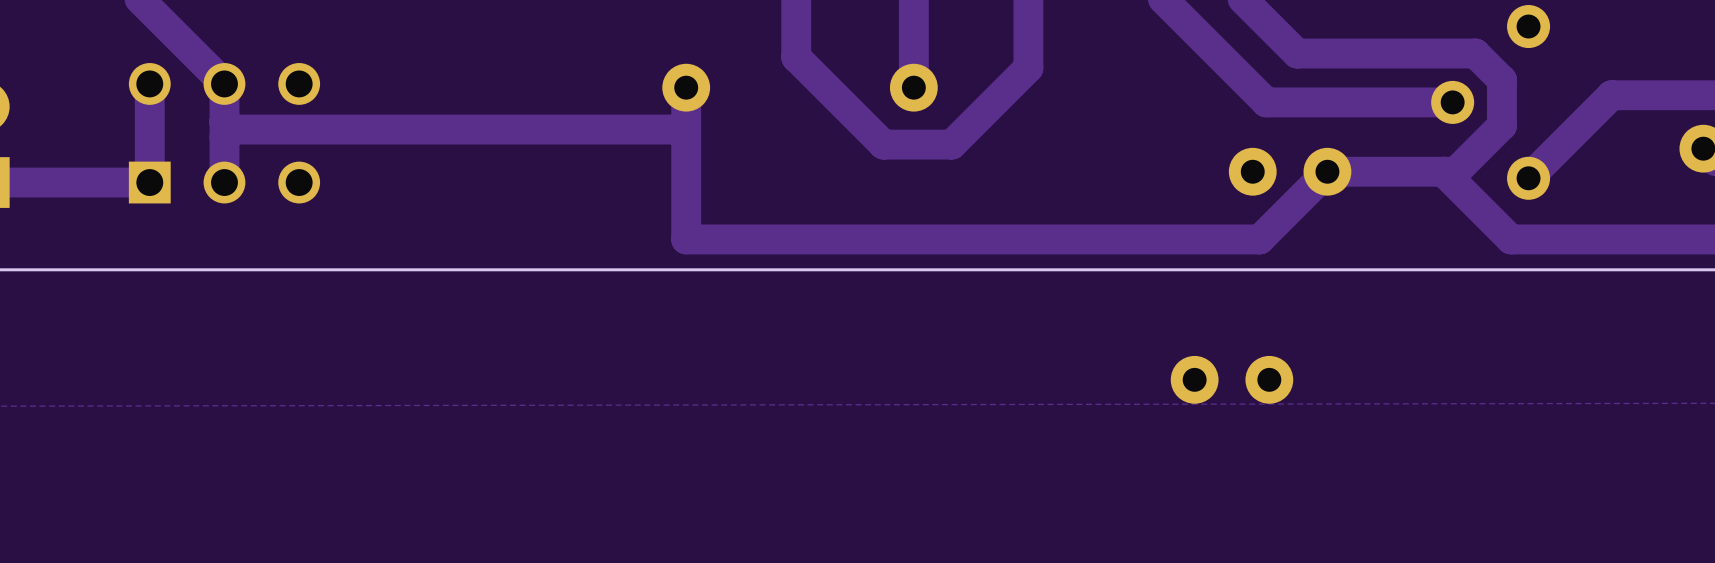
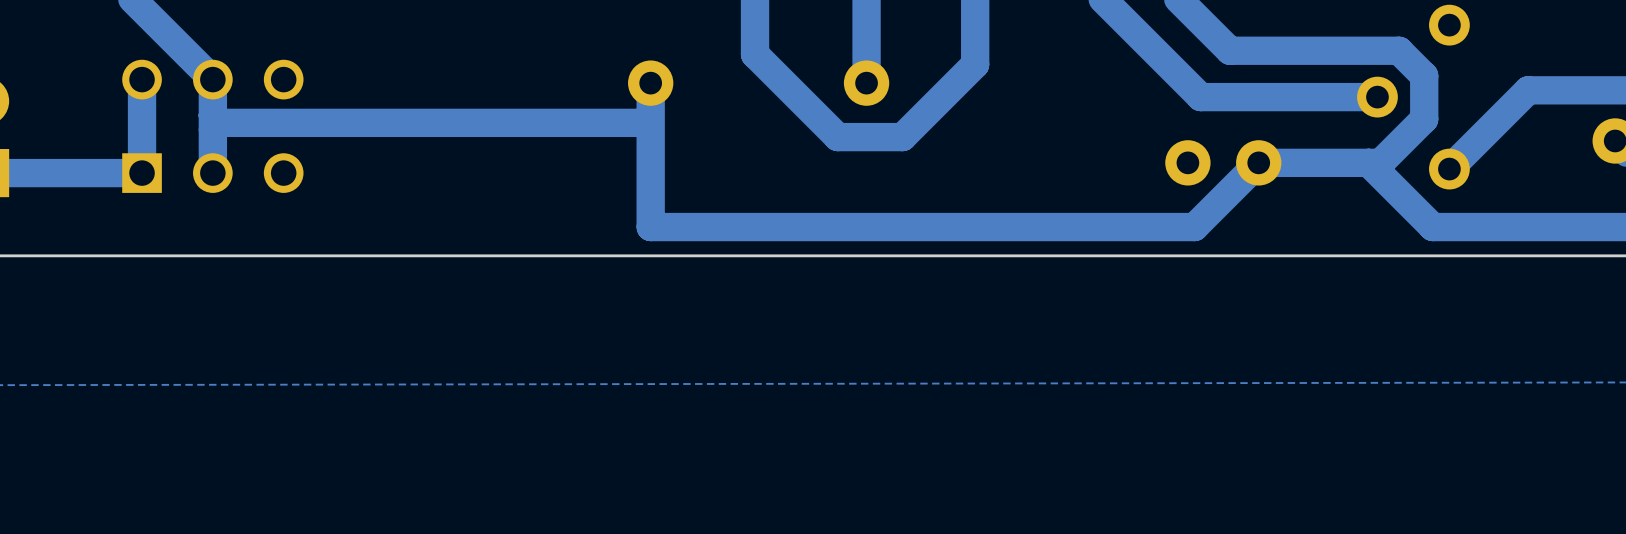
part: (1231, 379) -> none

